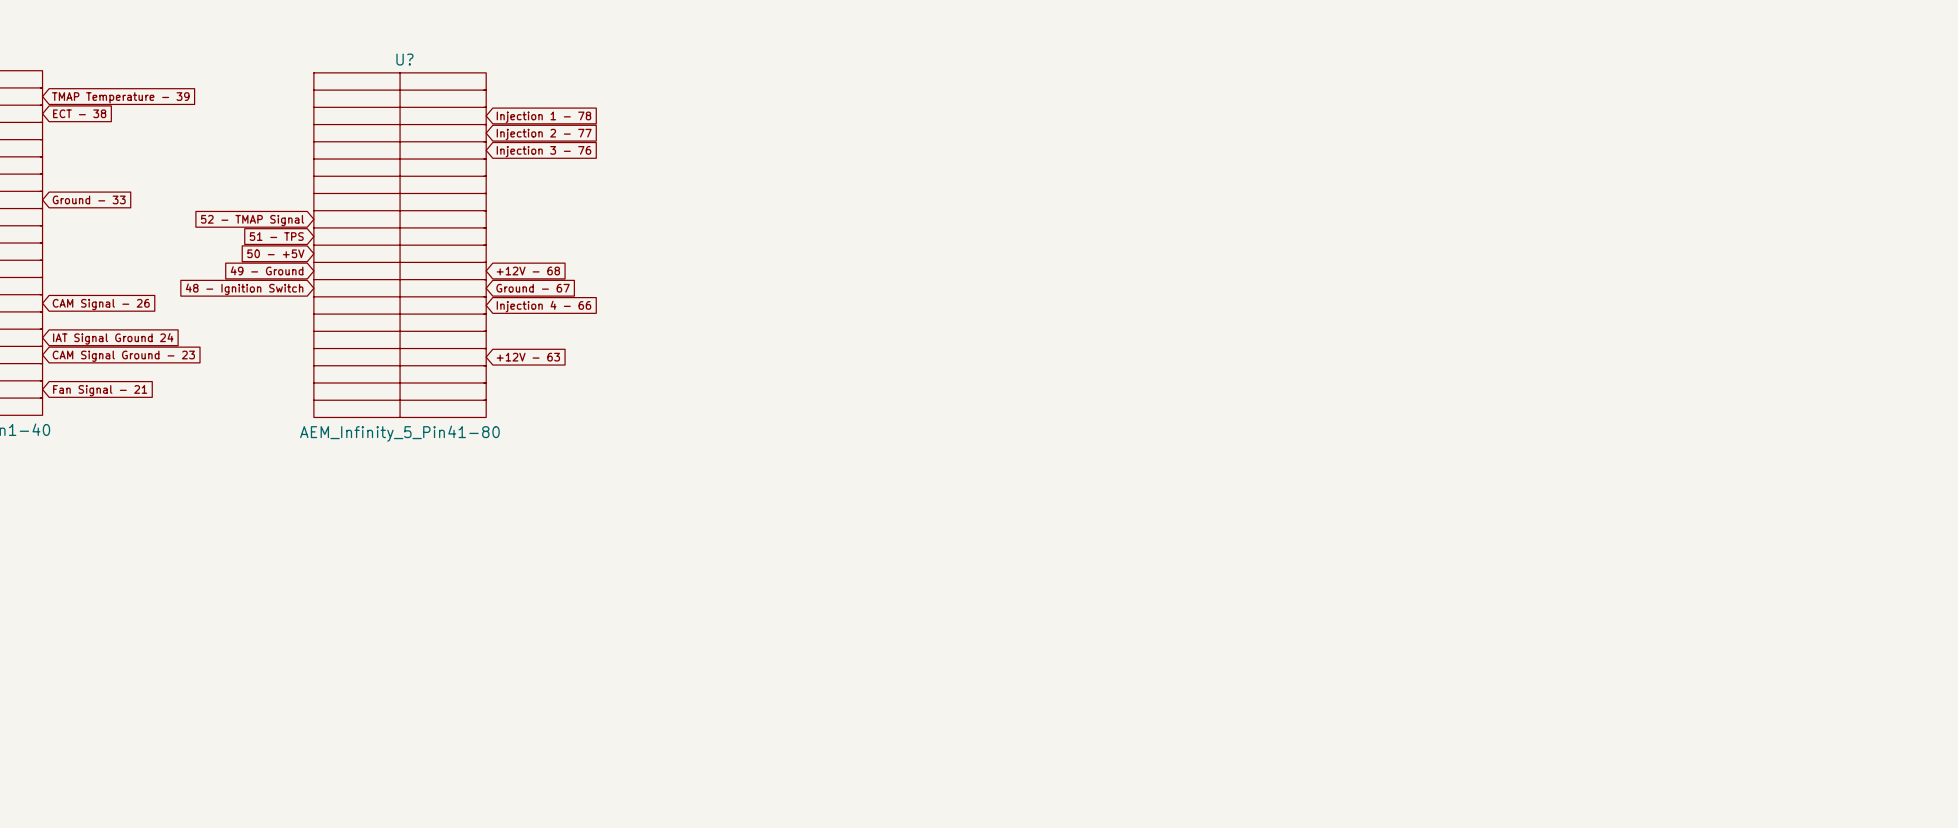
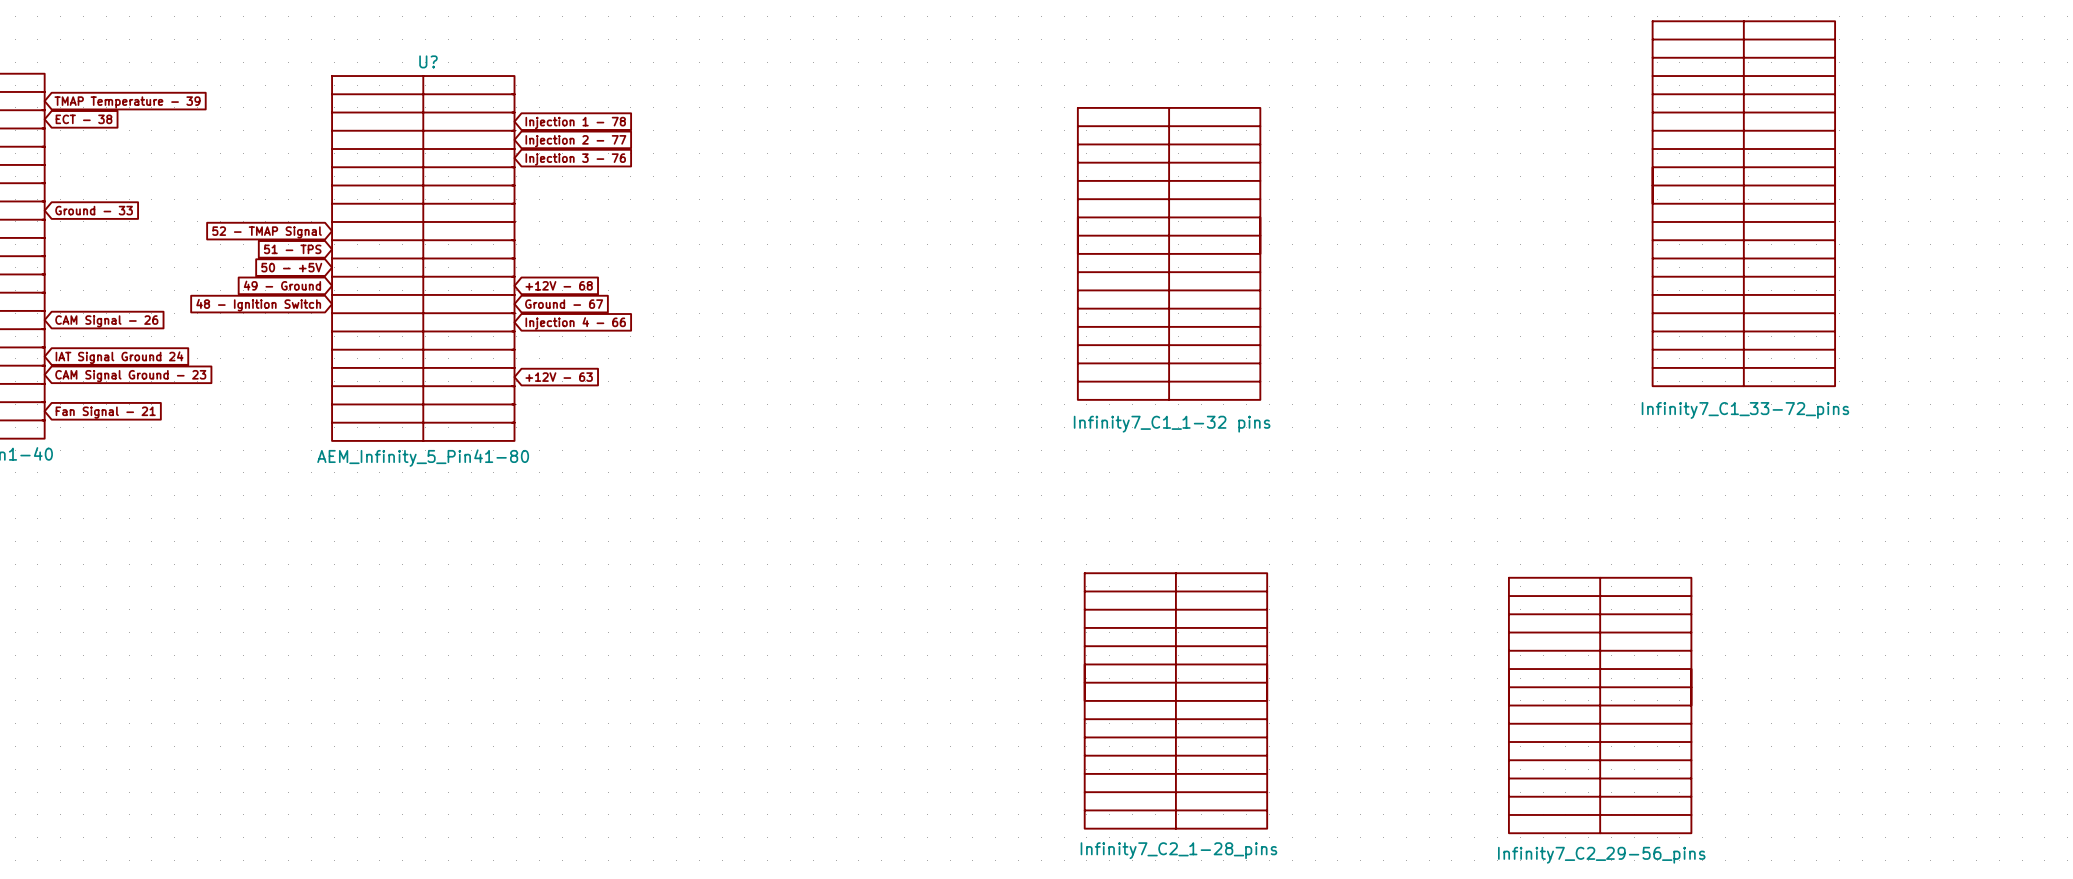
part: none -> Infinity7_C1_33-72_pins (1743, 203)
part: none -> Infinity7_C1_1-32 pins (1169, 253)
part: none -> Infinity7_C2_1-28_pins (1175, 700)
part: none -> Infinity7_C2_29-56_pins (1600, 705)

